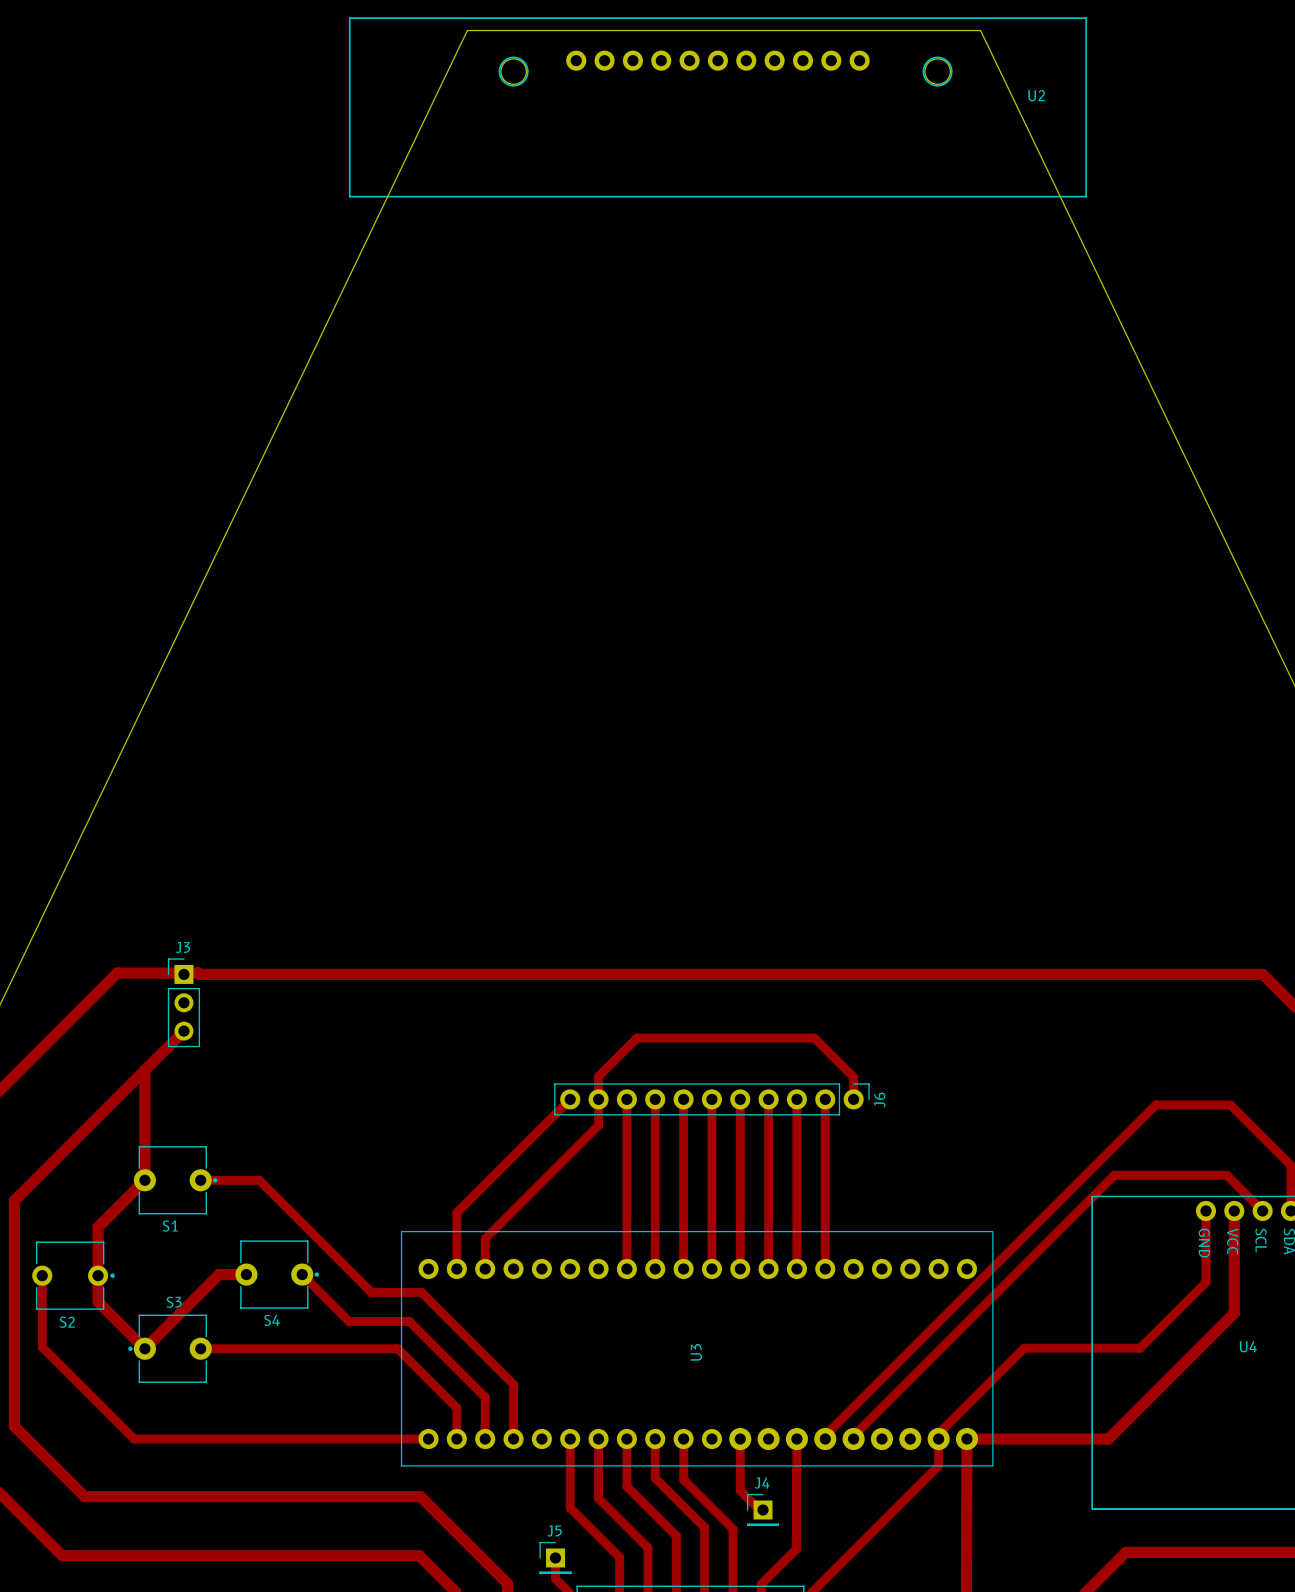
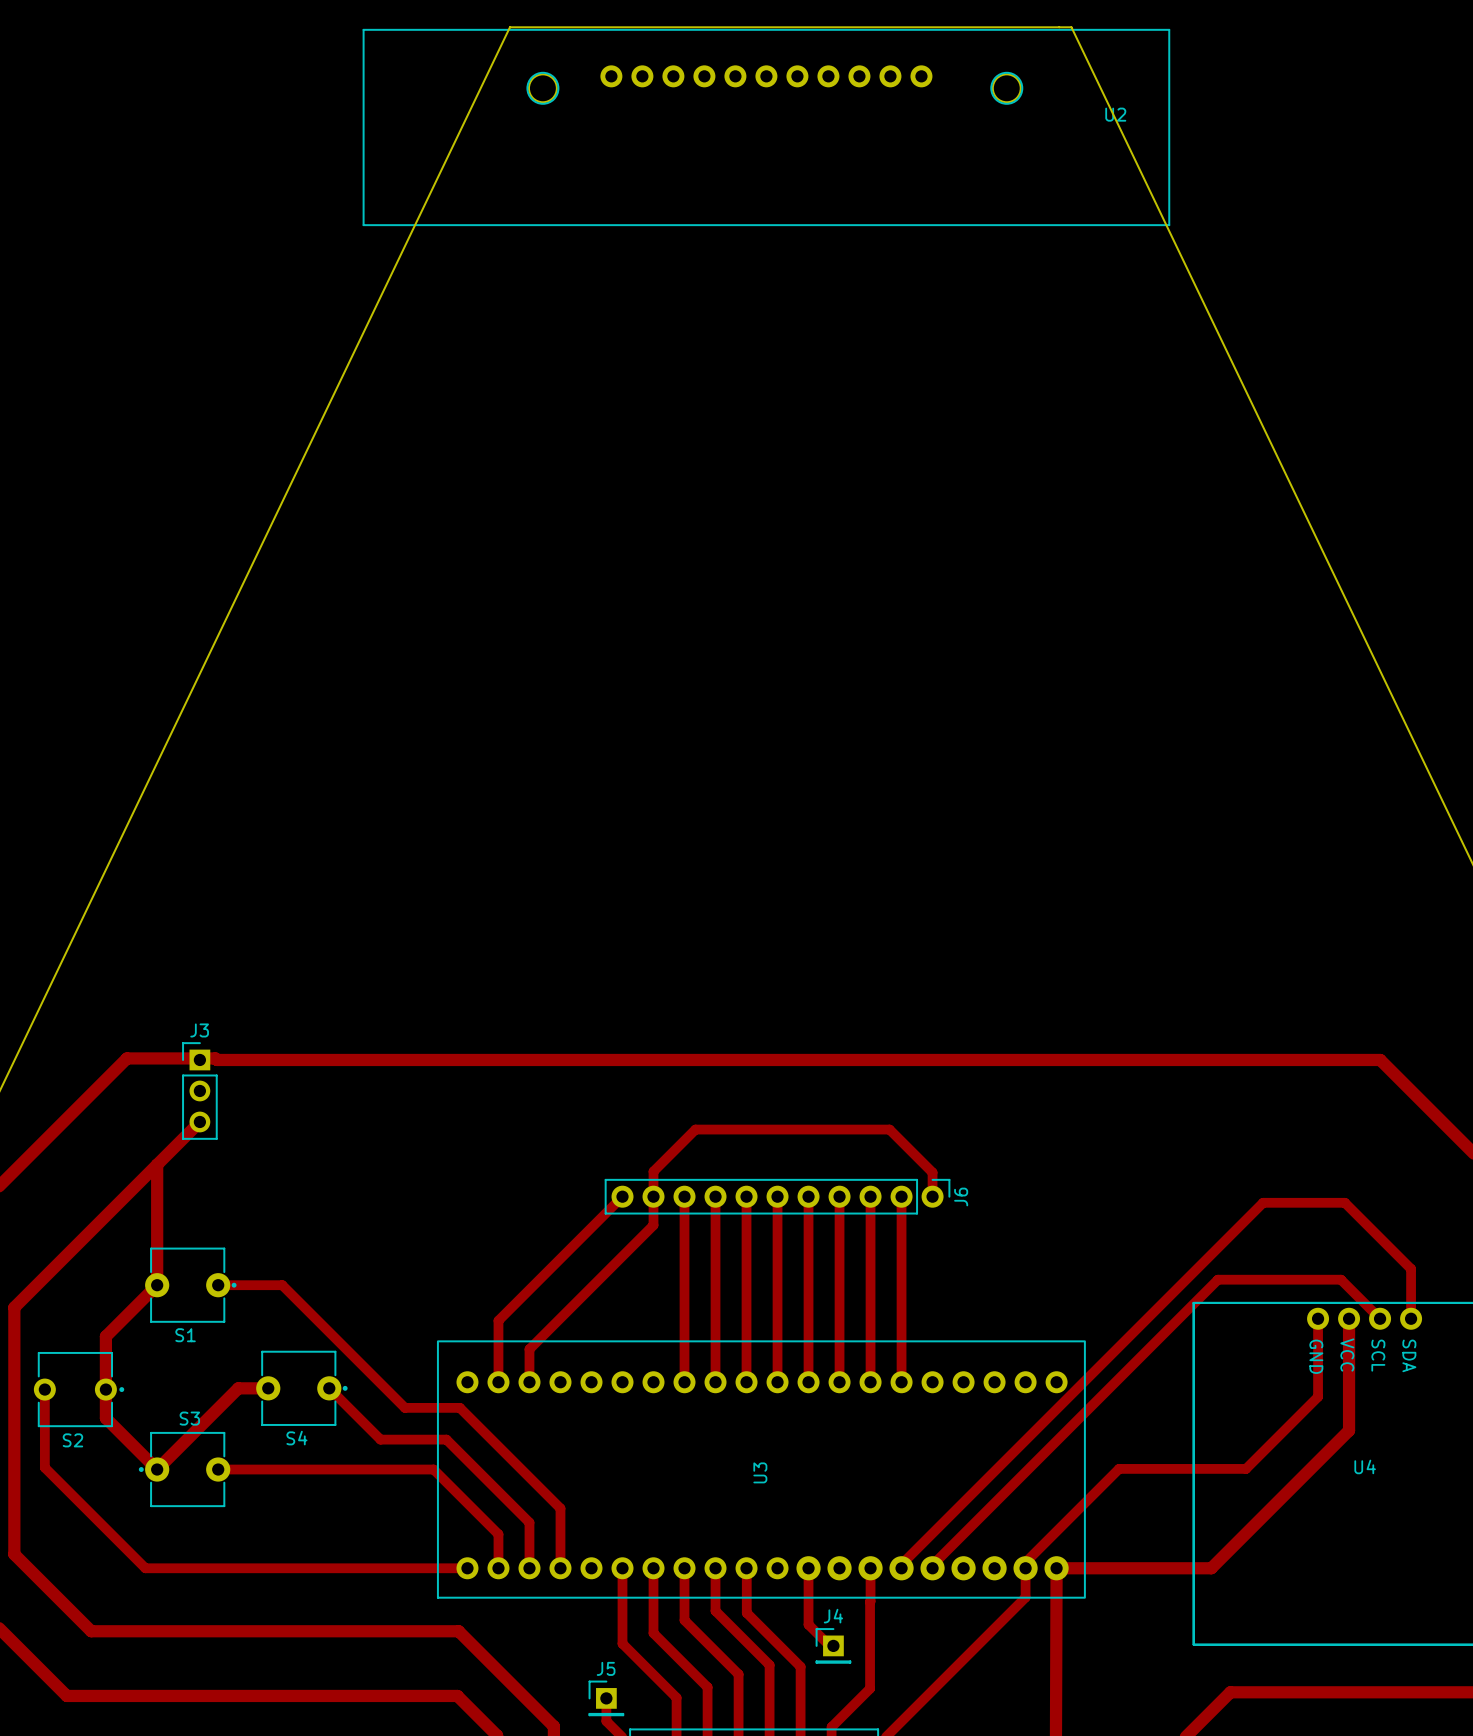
U2 position: (717, 107) -> (766, 127)

